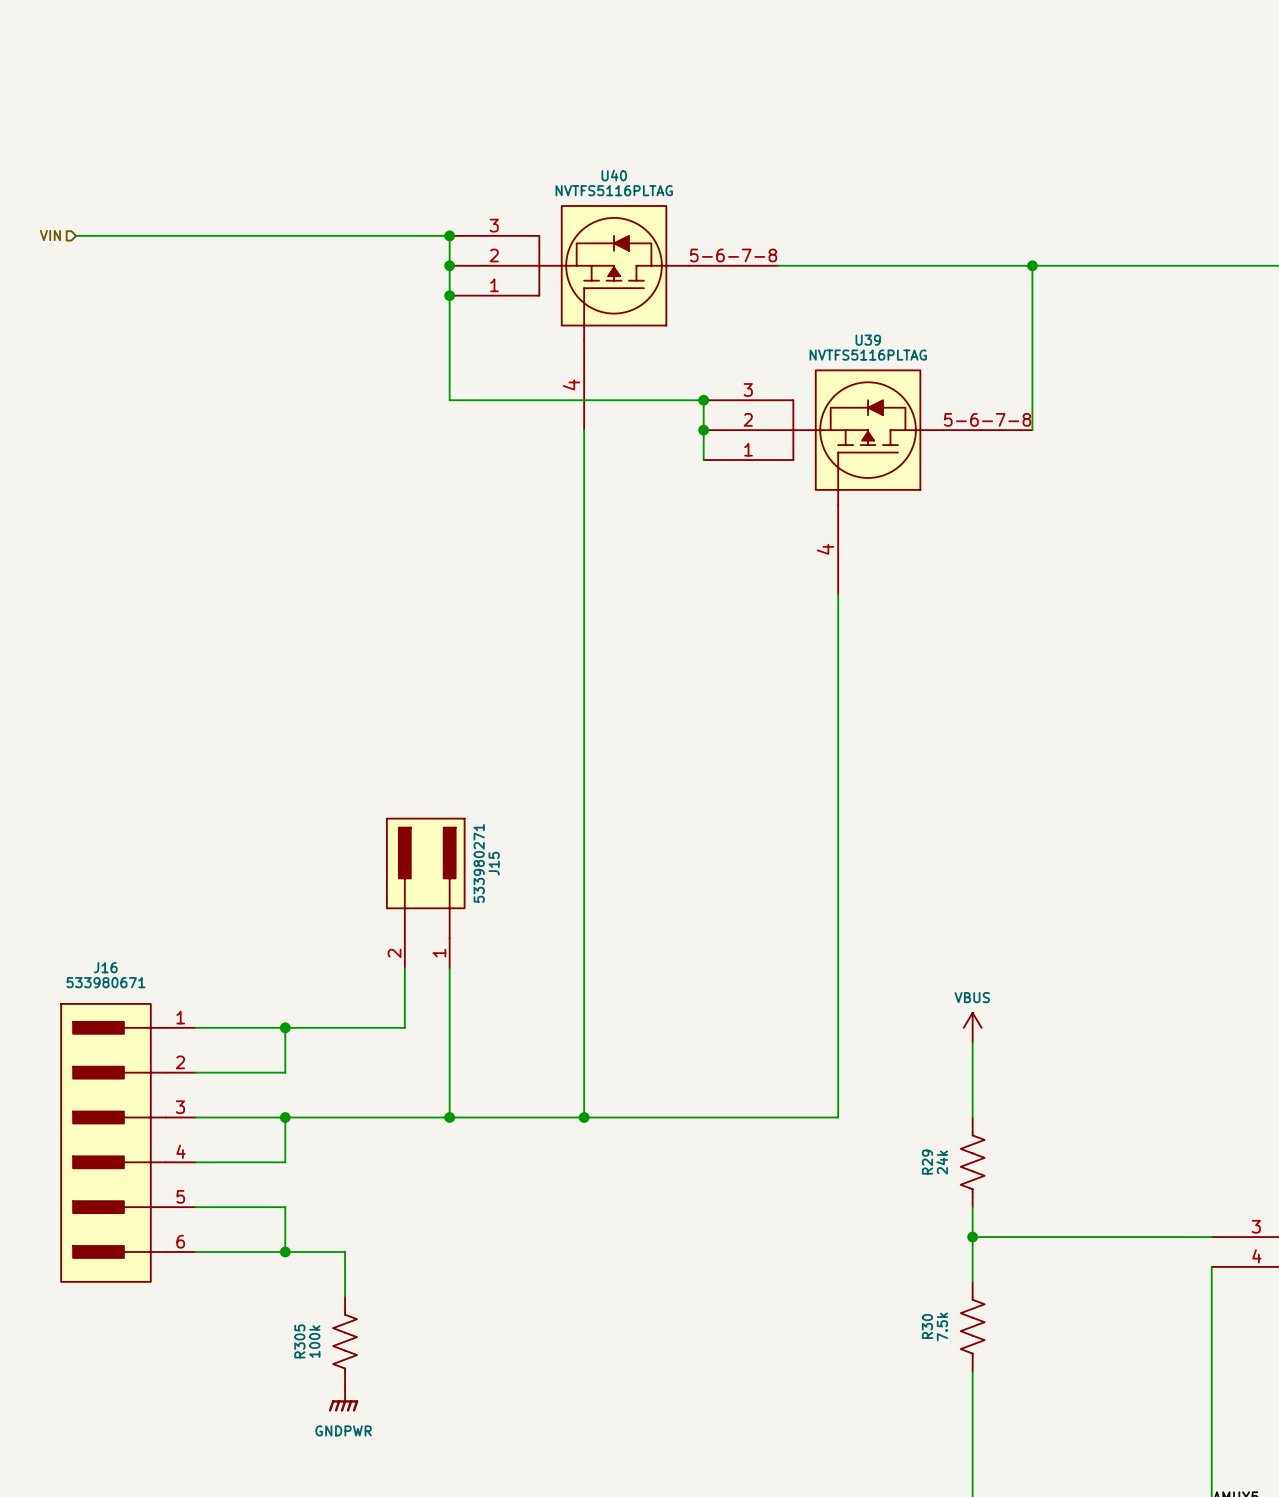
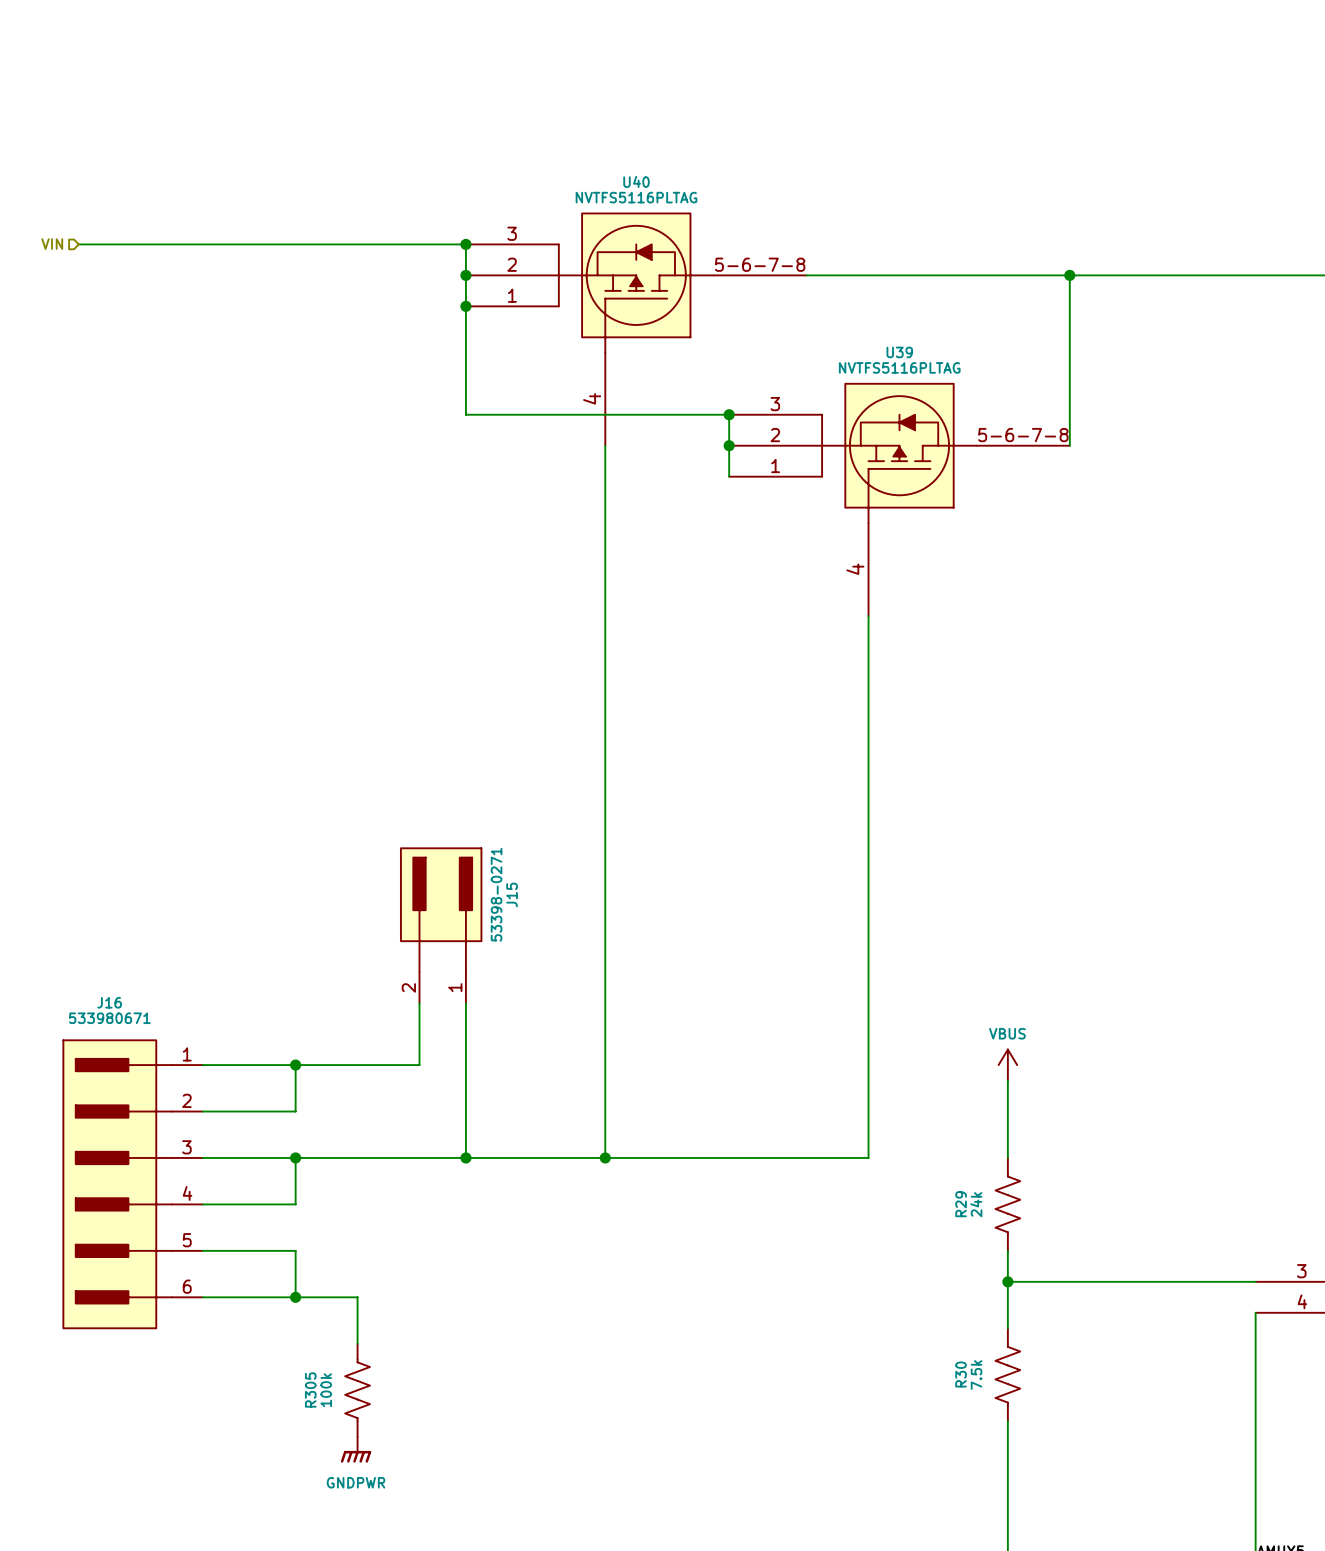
J15 value: 533980271 (479, 863) -> 53398-0271 (496, 894)

